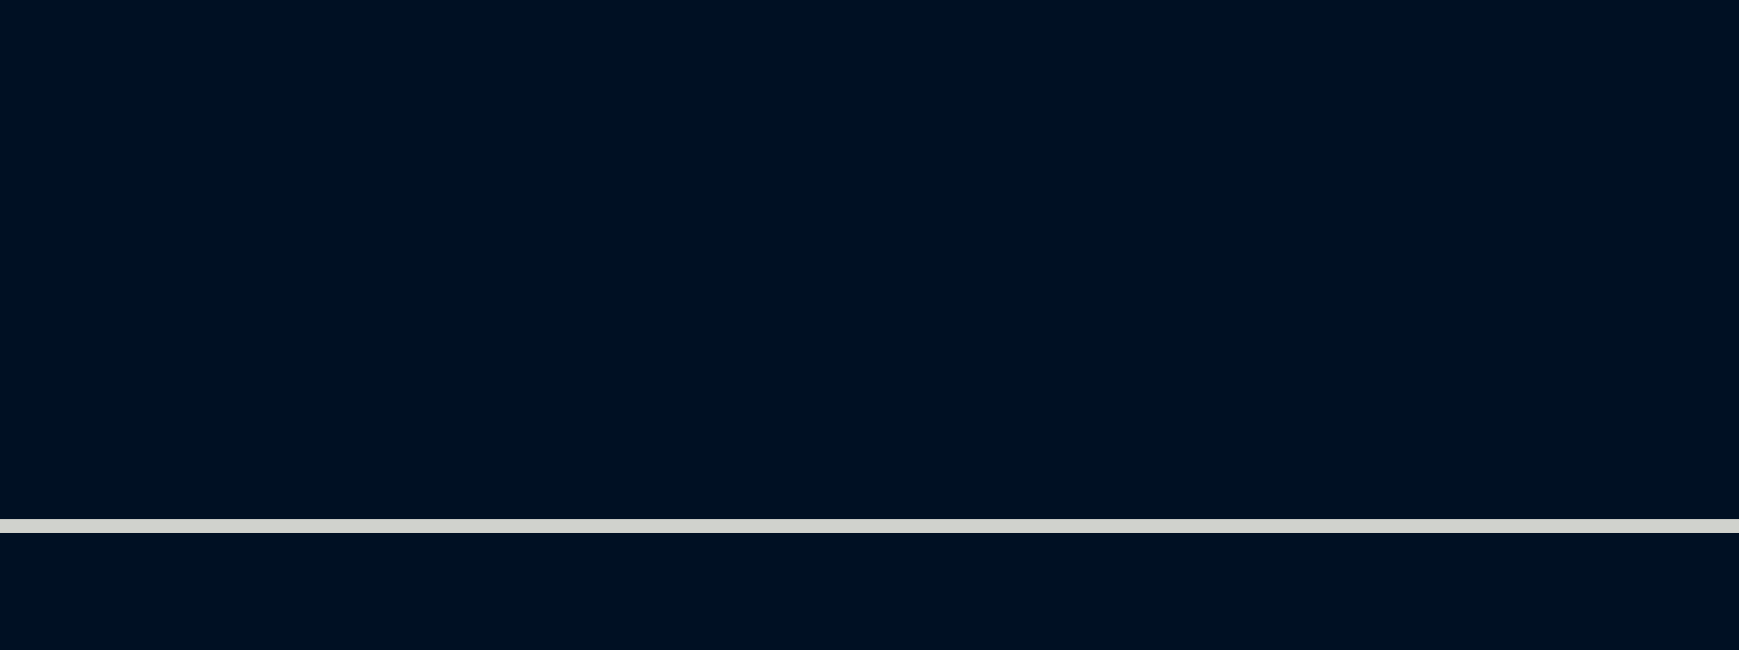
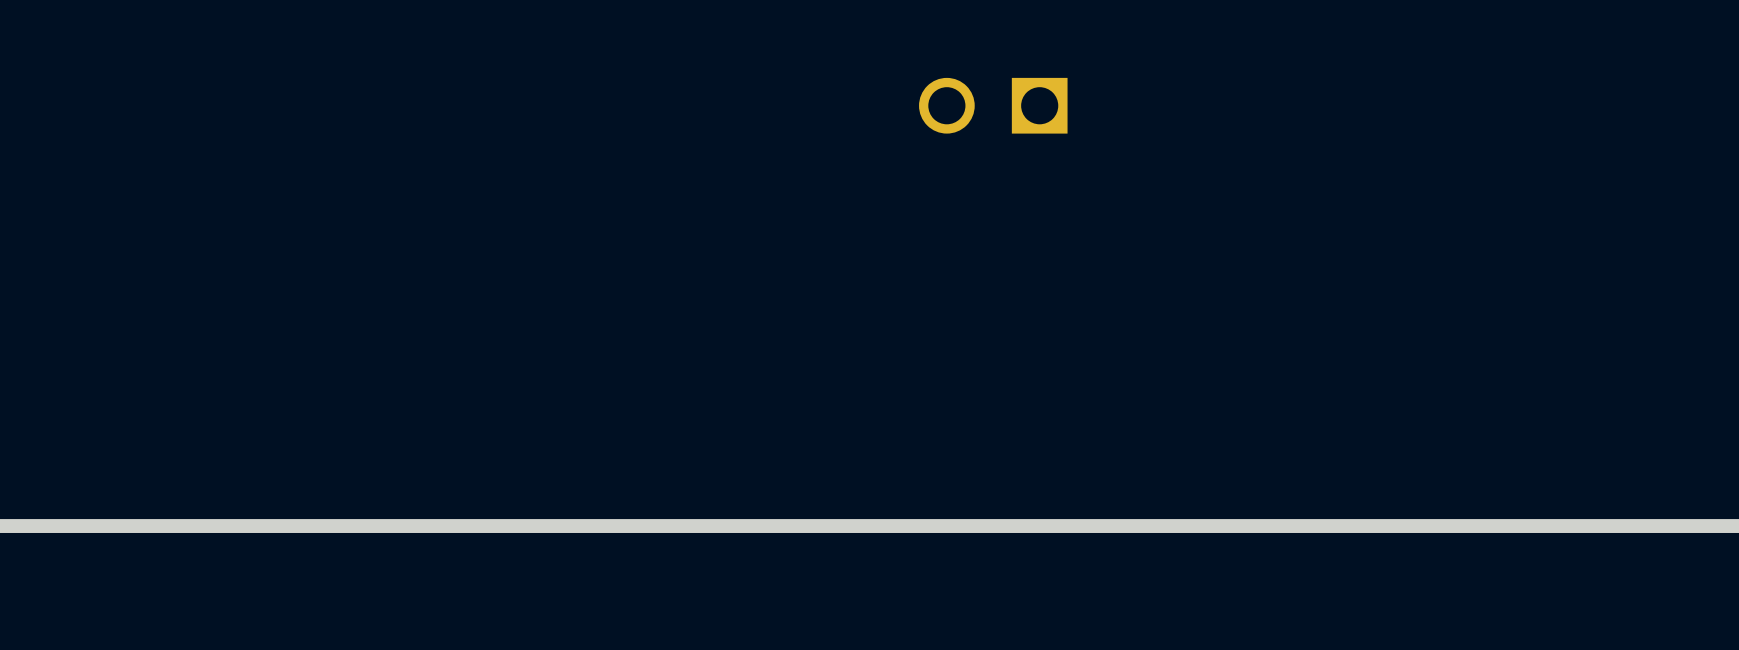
part: none -> (993, 105)

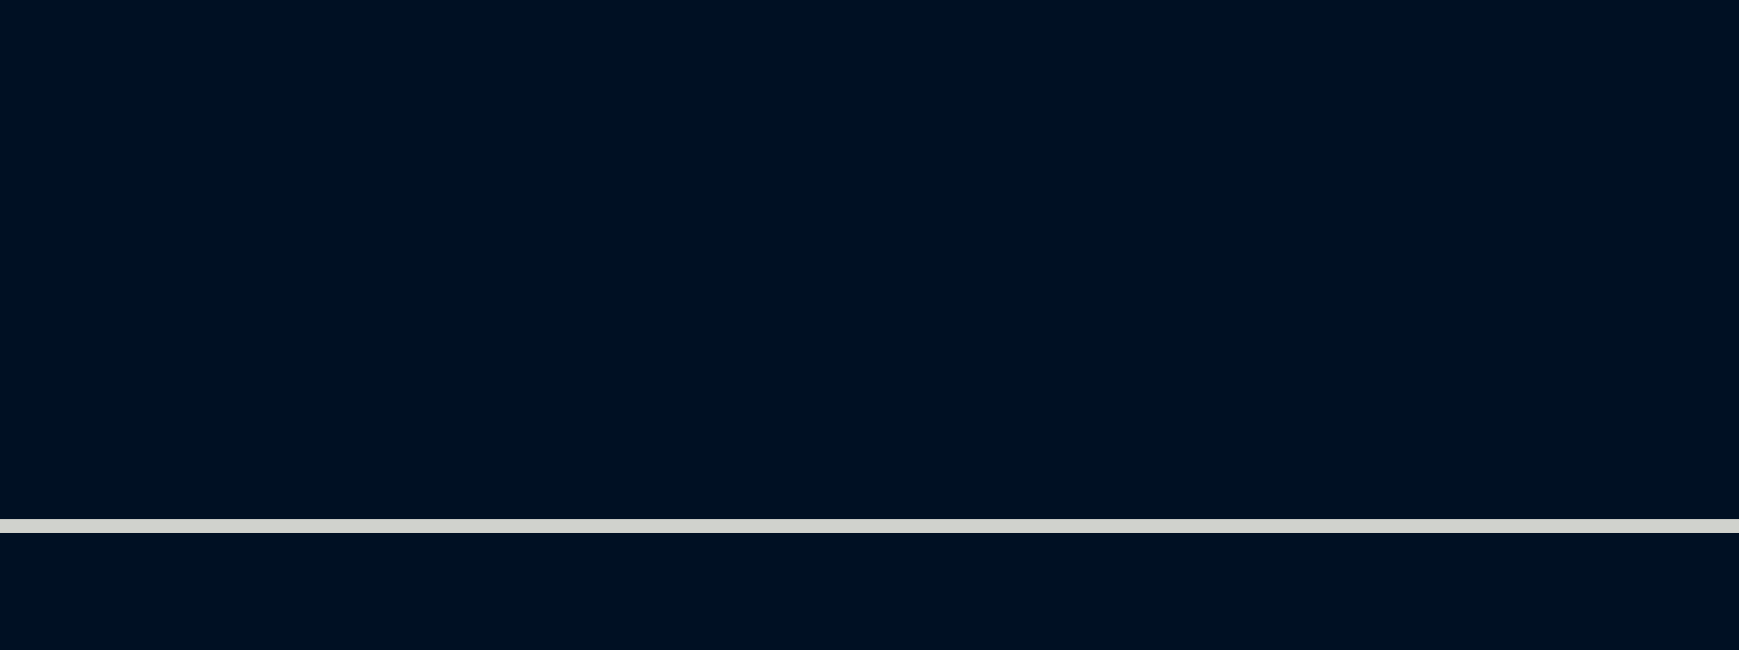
part: (993, 105) -> none

